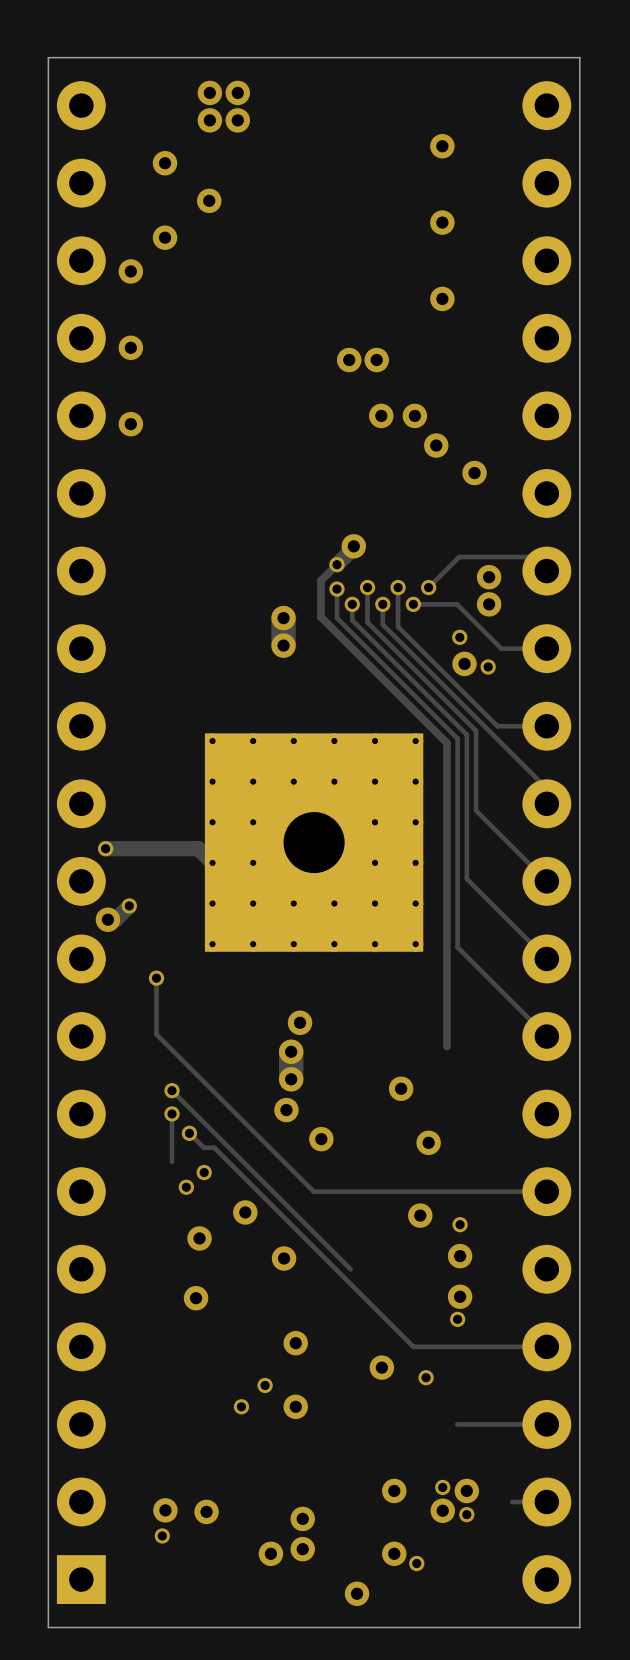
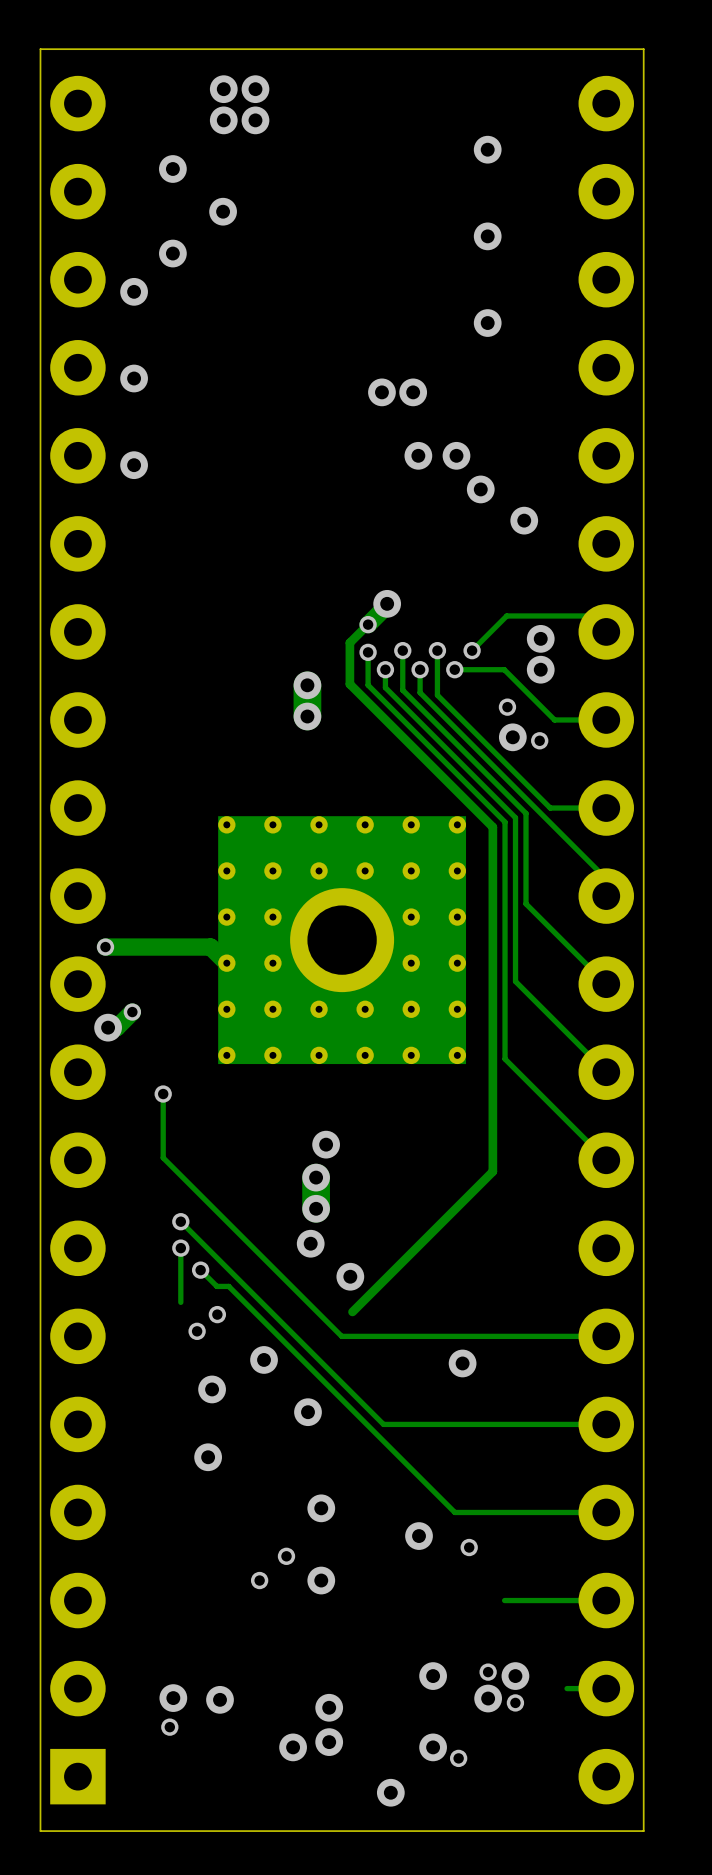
track: none -> (492, 1171) (352, 1311)
via: (401, 1088) -> none
via: (428, 1142) -> none
via: (460, 1224) -> none
via: (460, 1256) -> none
track: none -> (606, 1424) (383, 1424)
via: (460, 1296) -> none
via: (457, 1319) -> none

